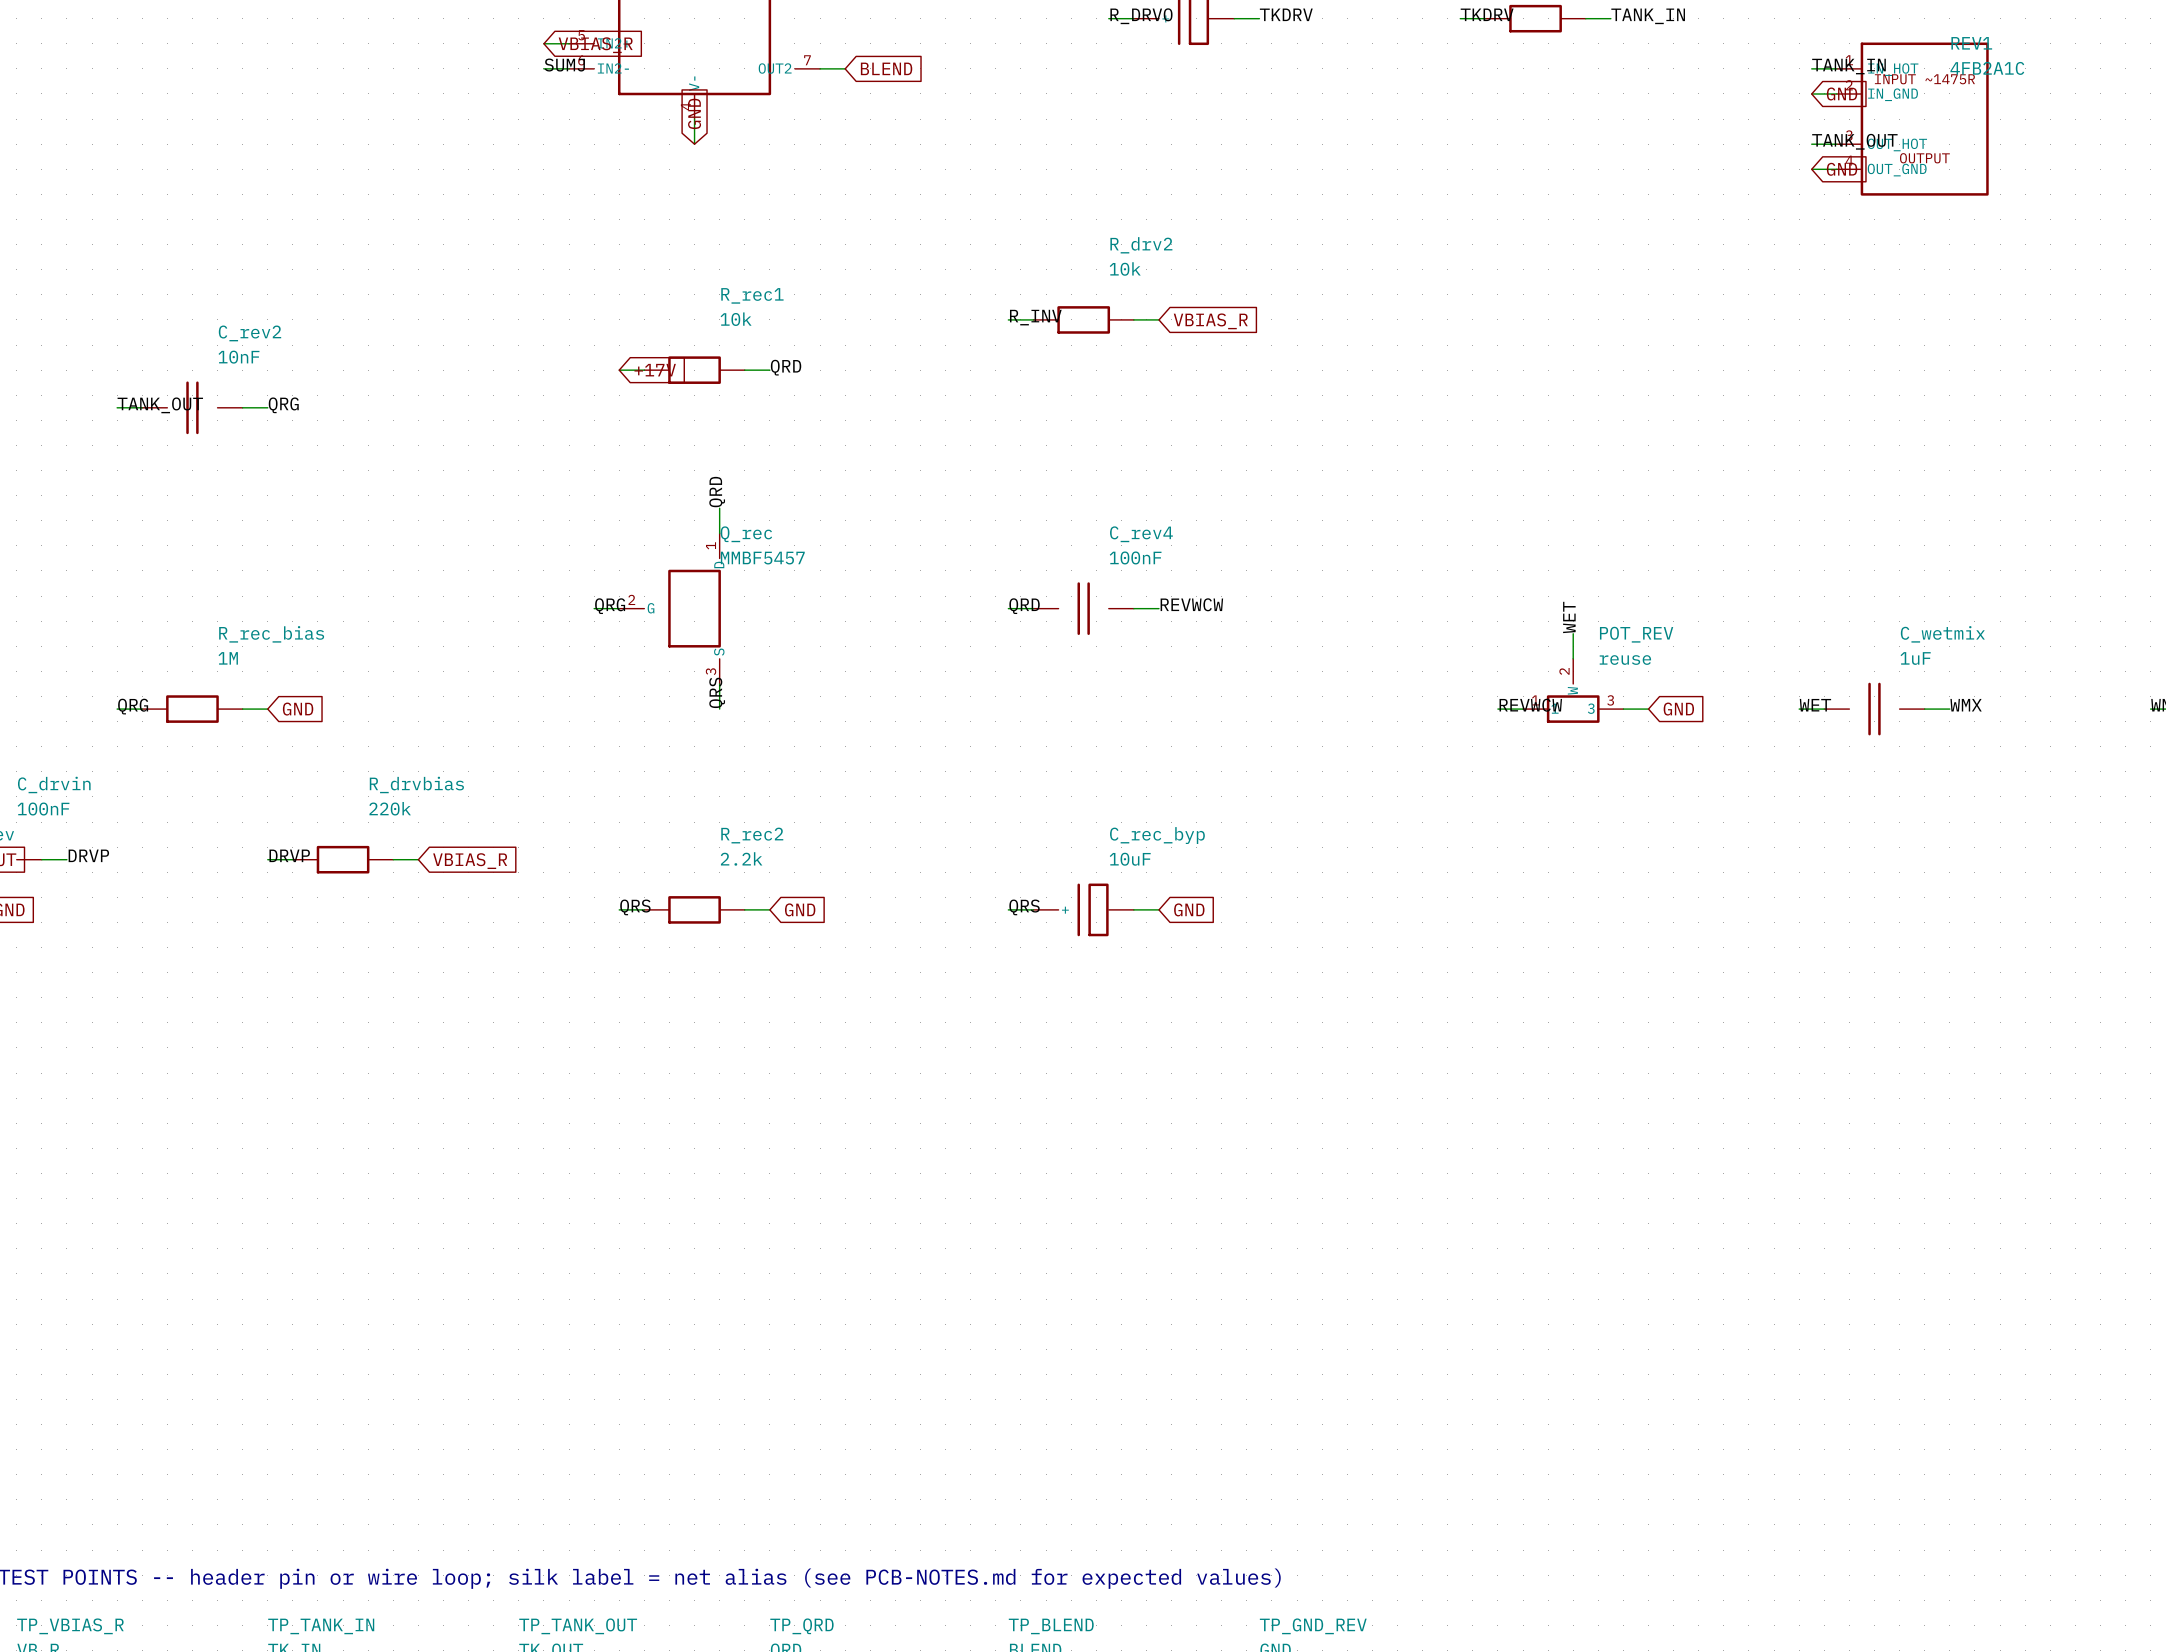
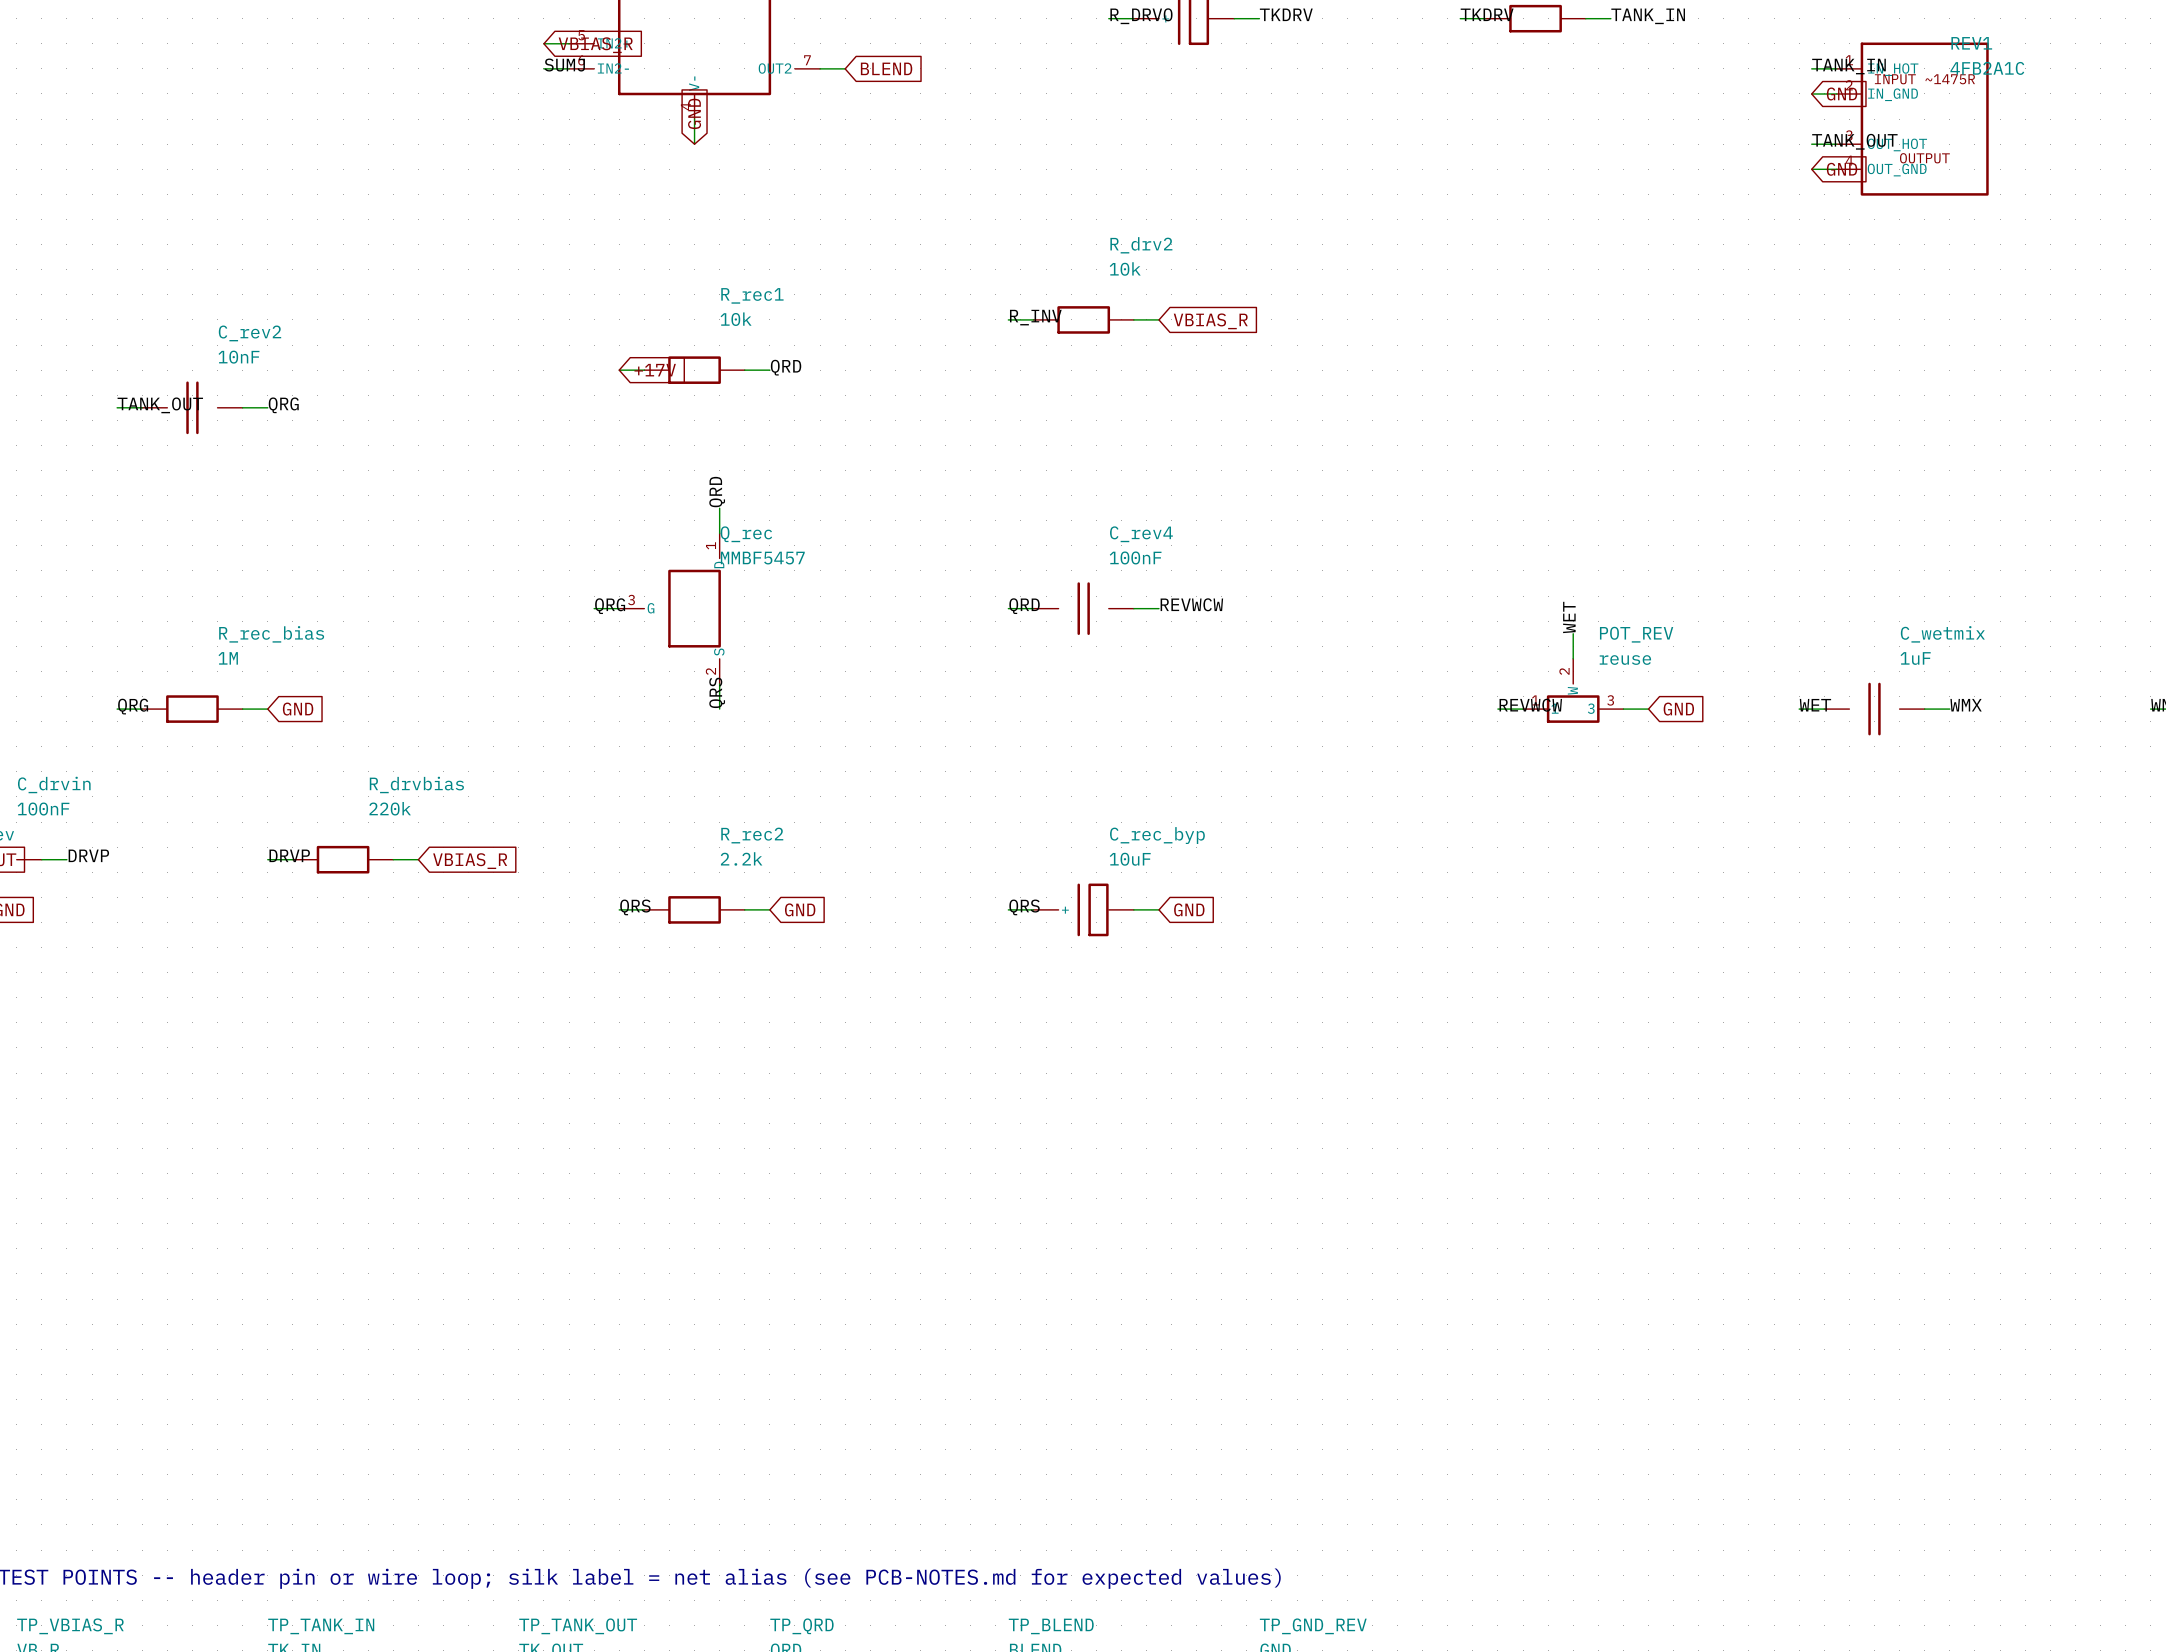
Q_rec pin number: 2 (631, 599) -> 3 (631, 600)
Q_rec pin number: 3 (711, 671) -> 2 (710, 671)

